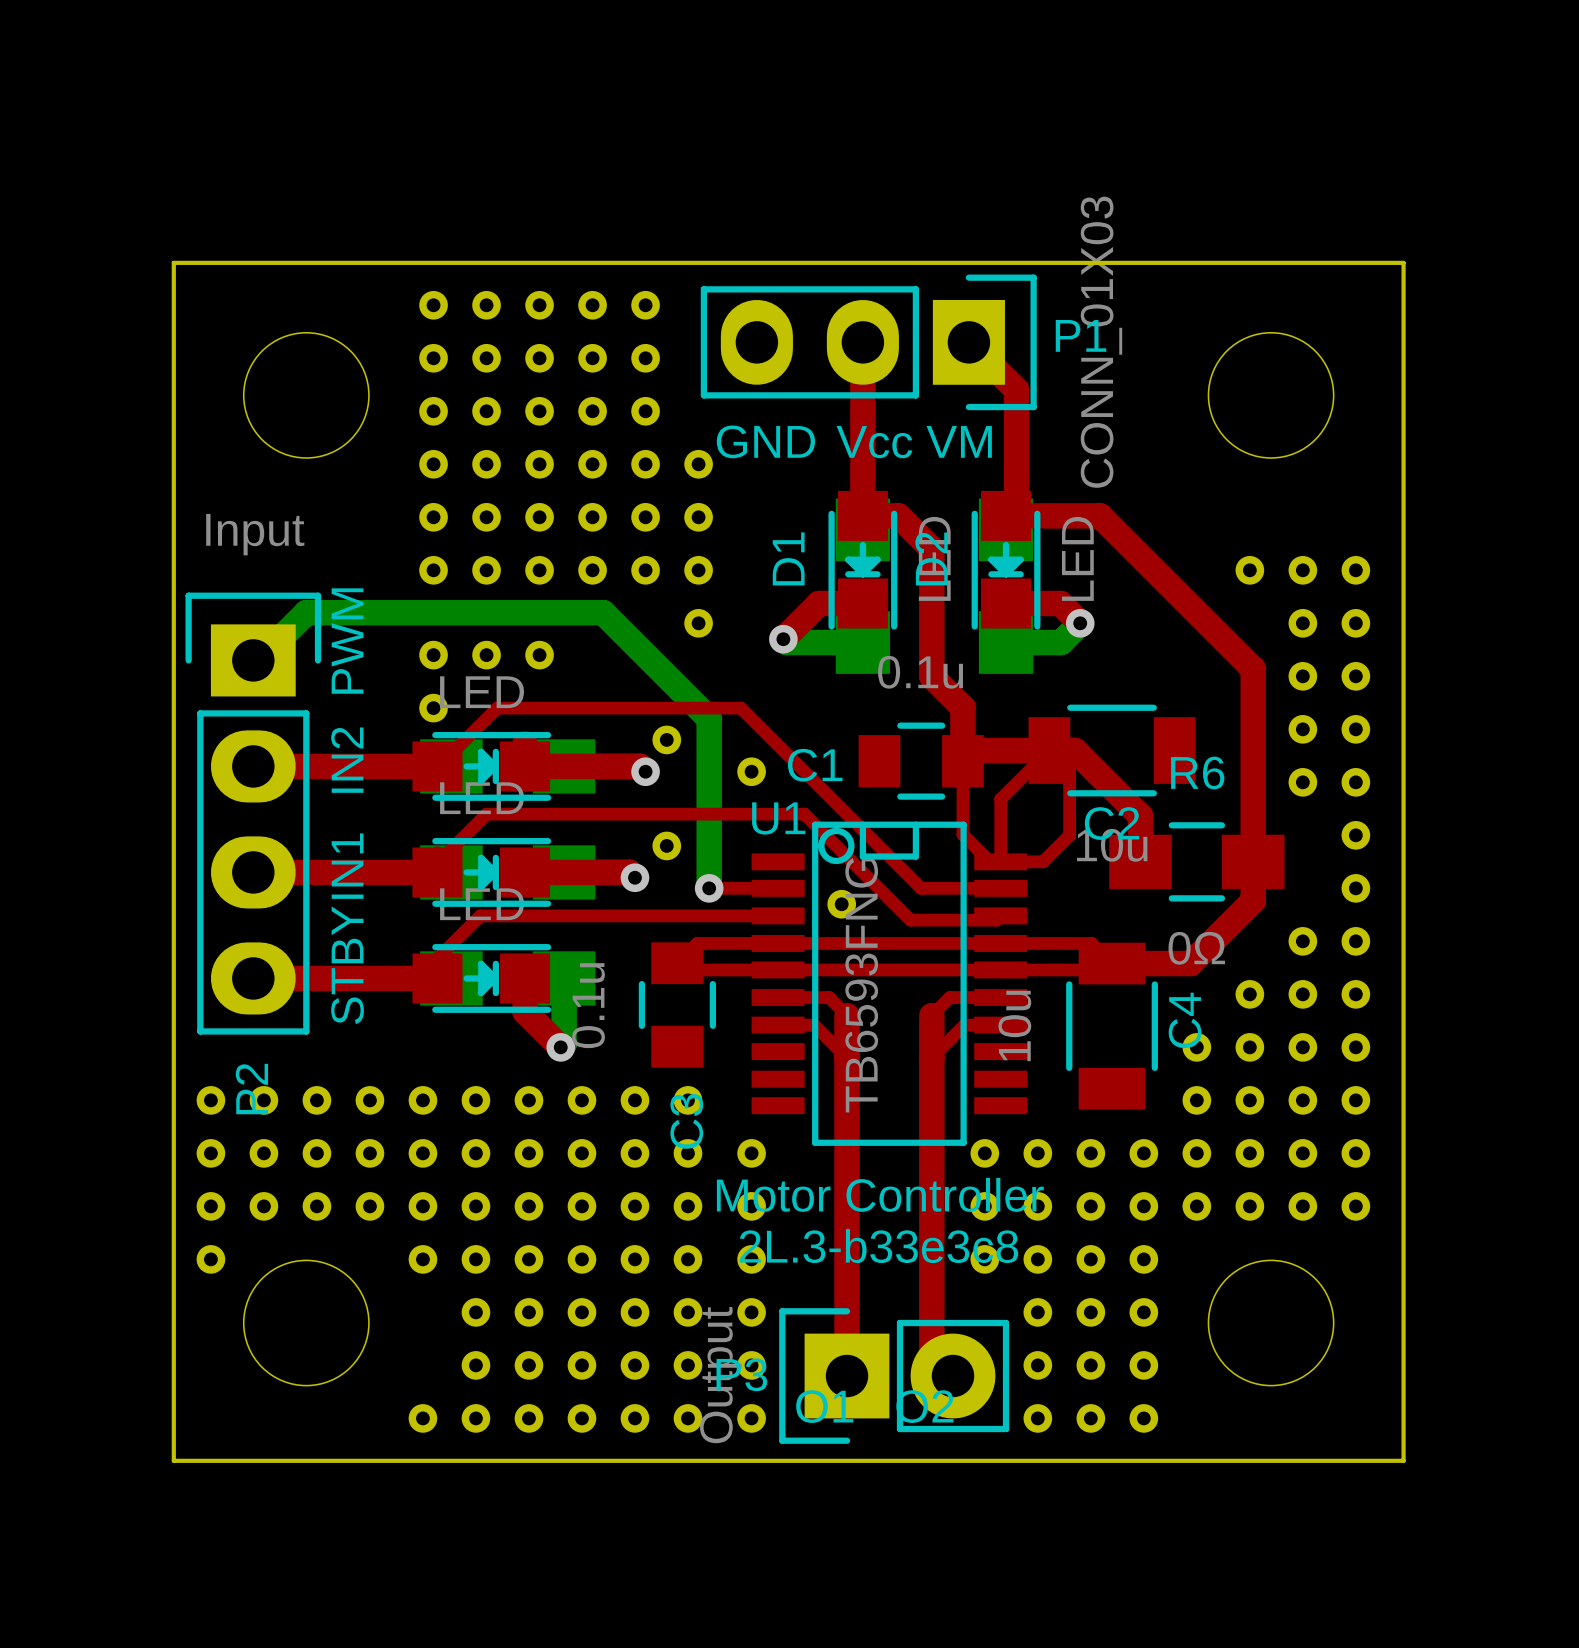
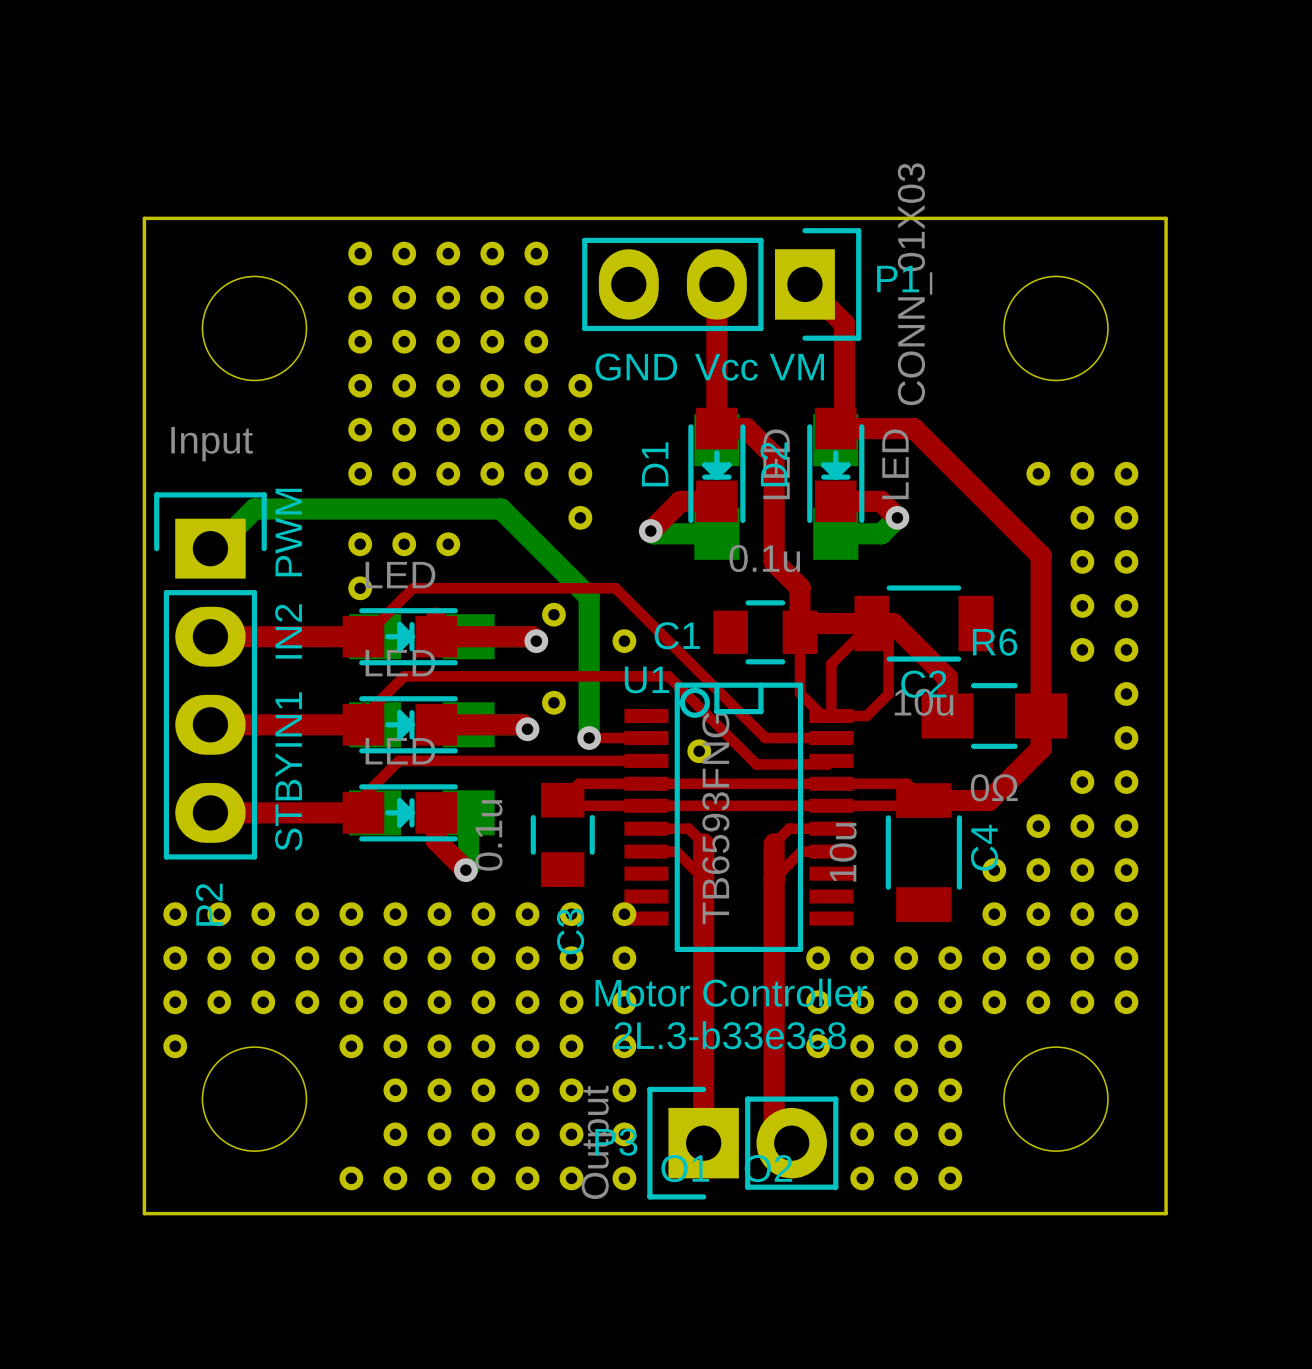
part: none -> (624, 914)

